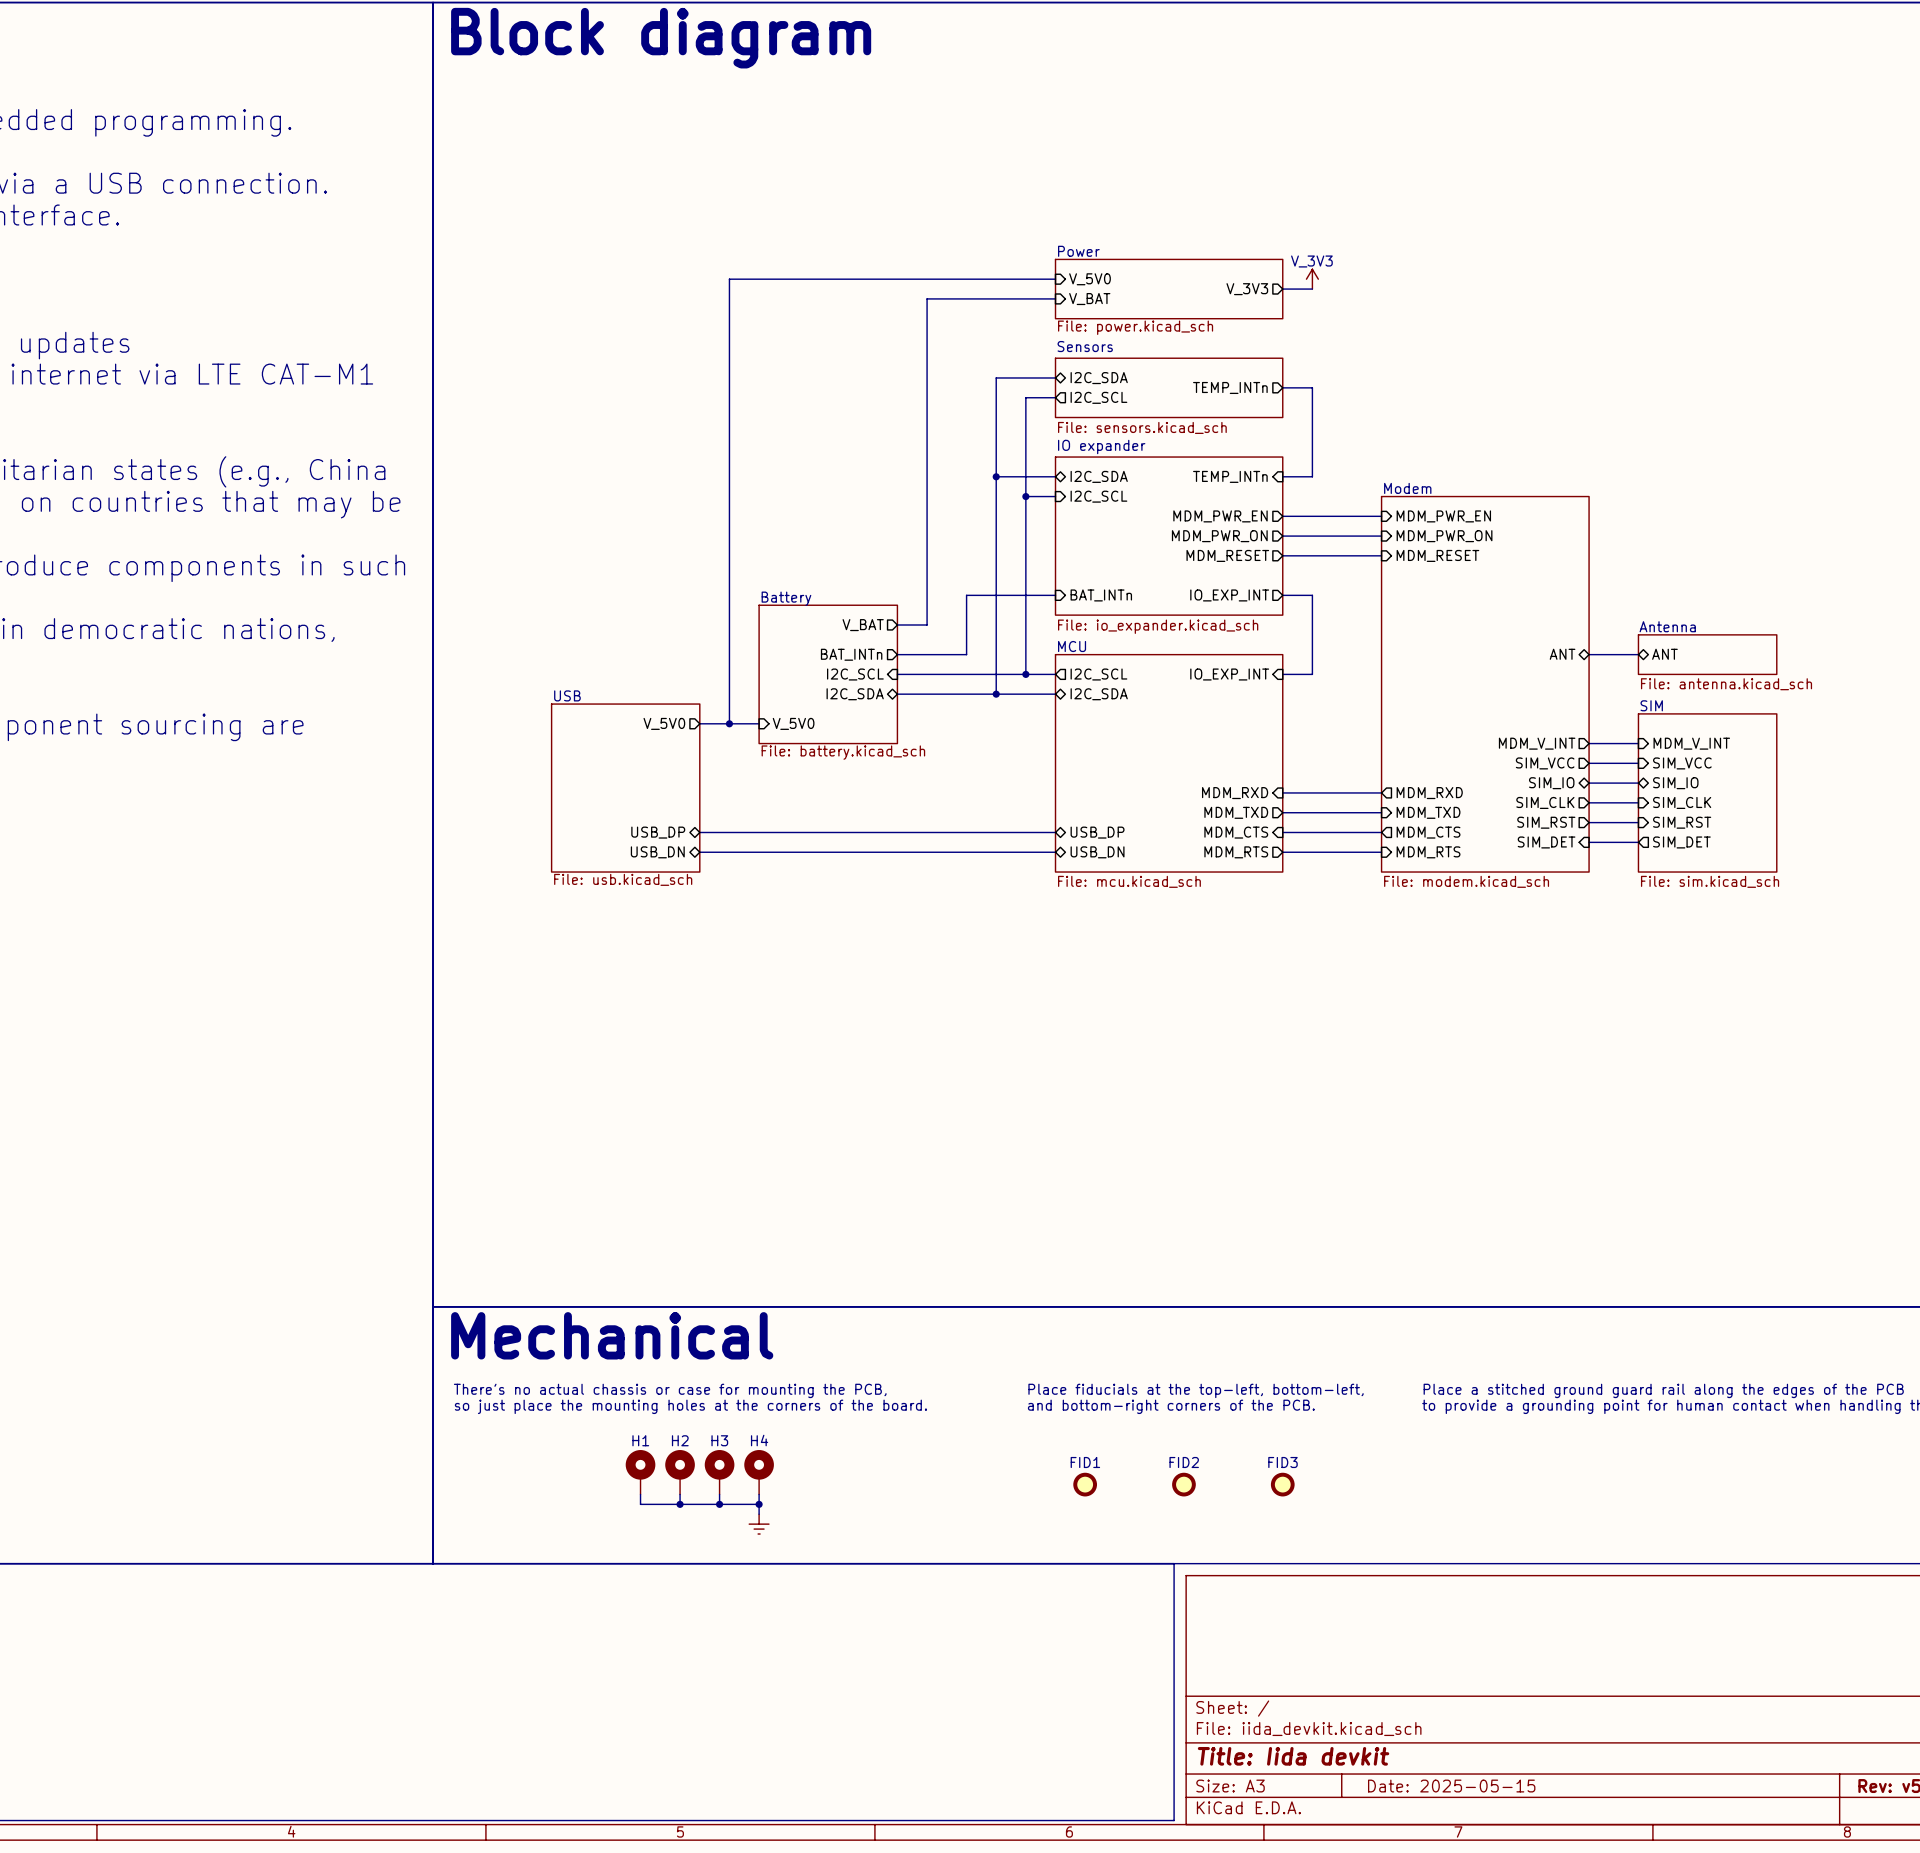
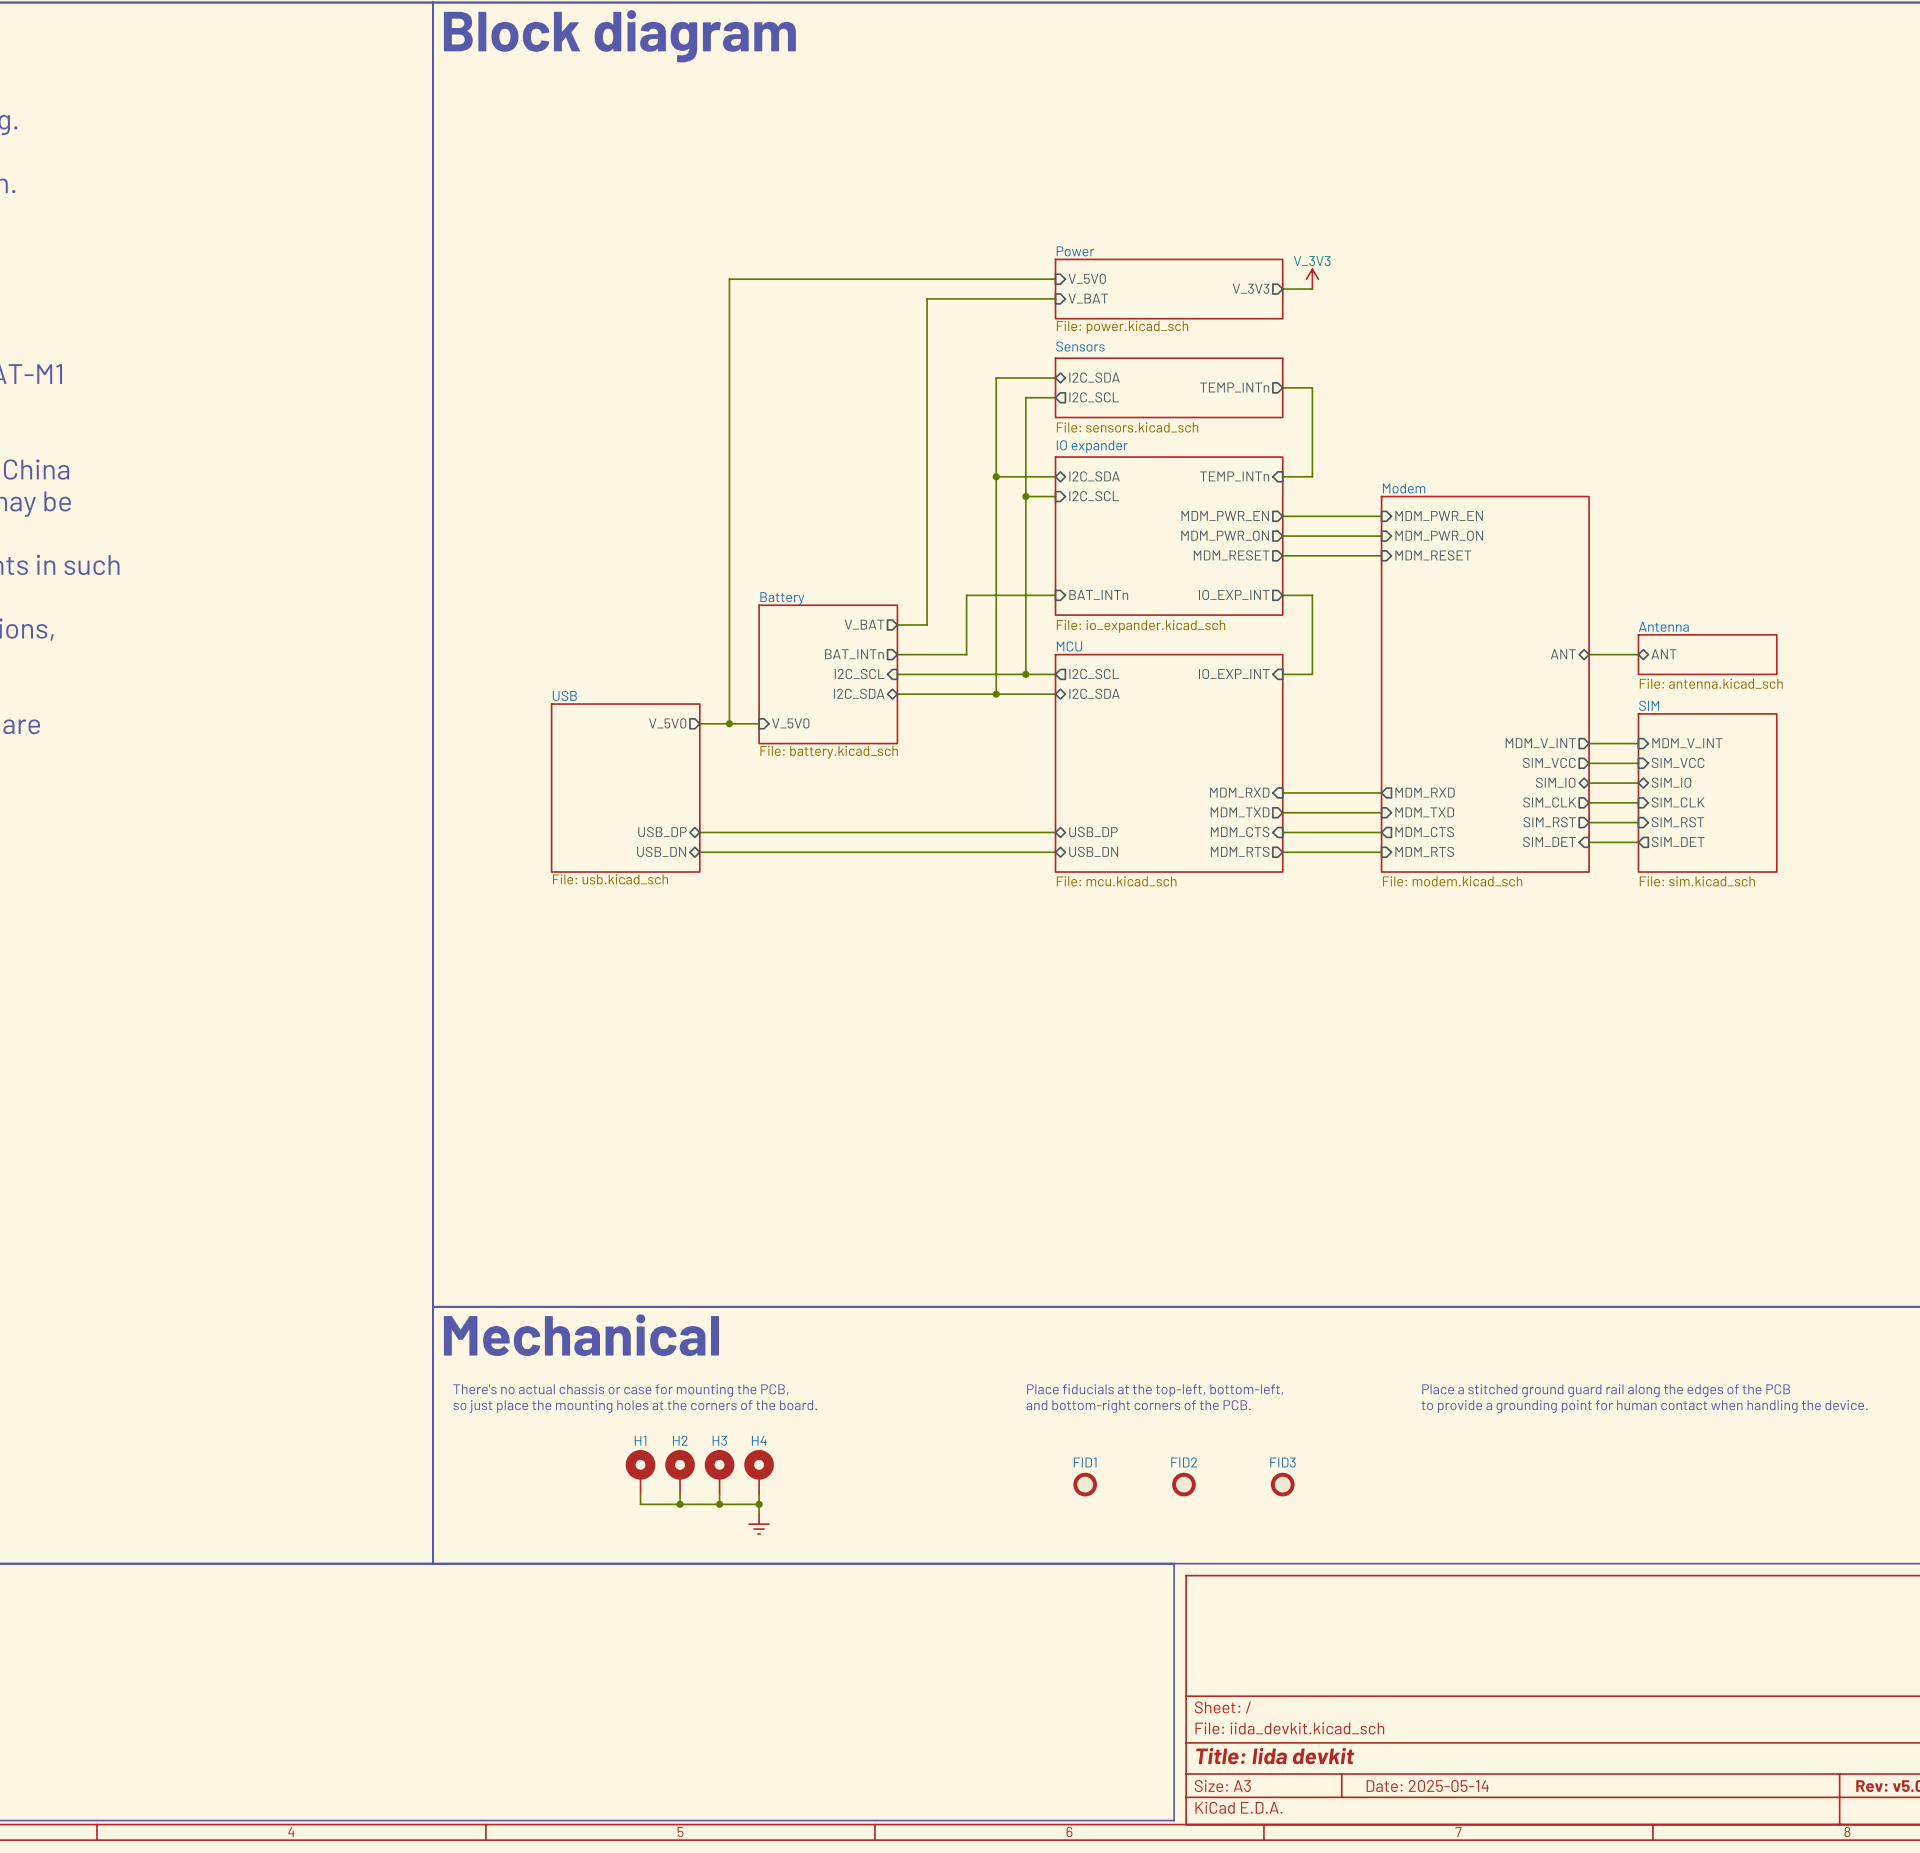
title block: Date: 2025-05-15 (1451, 1786) -> Date: 2025-05-14 (1427, 1786)

